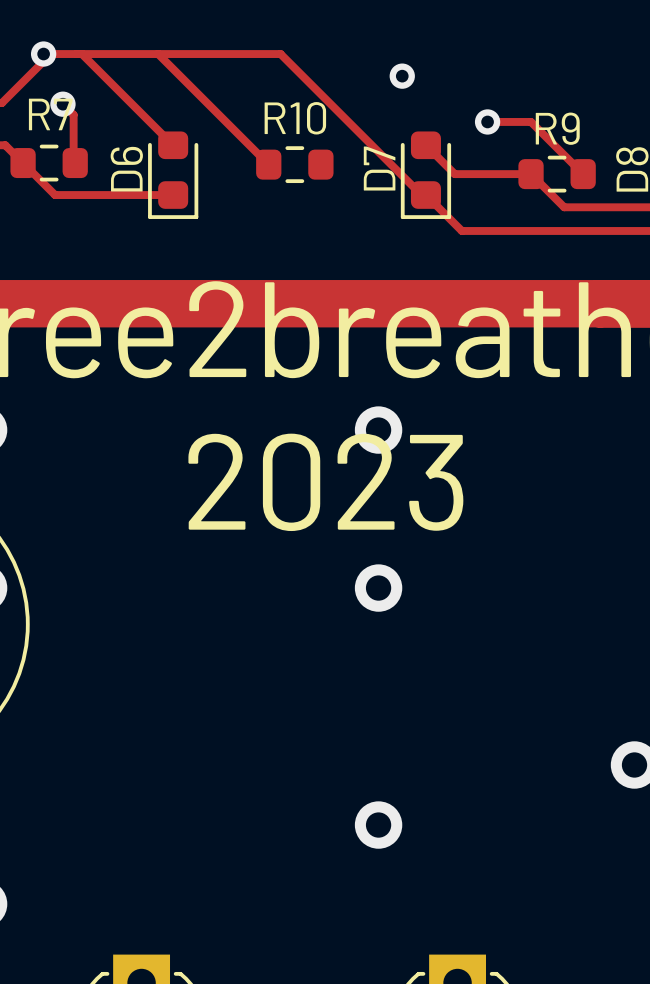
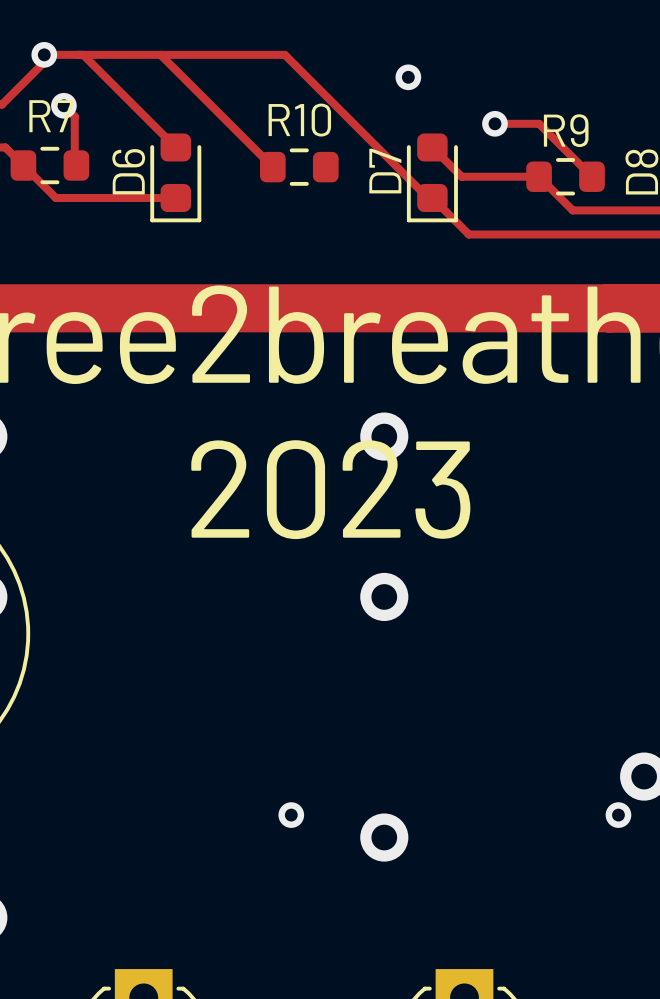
via: none -> (291, 815)
via: none -> (618, 815)

